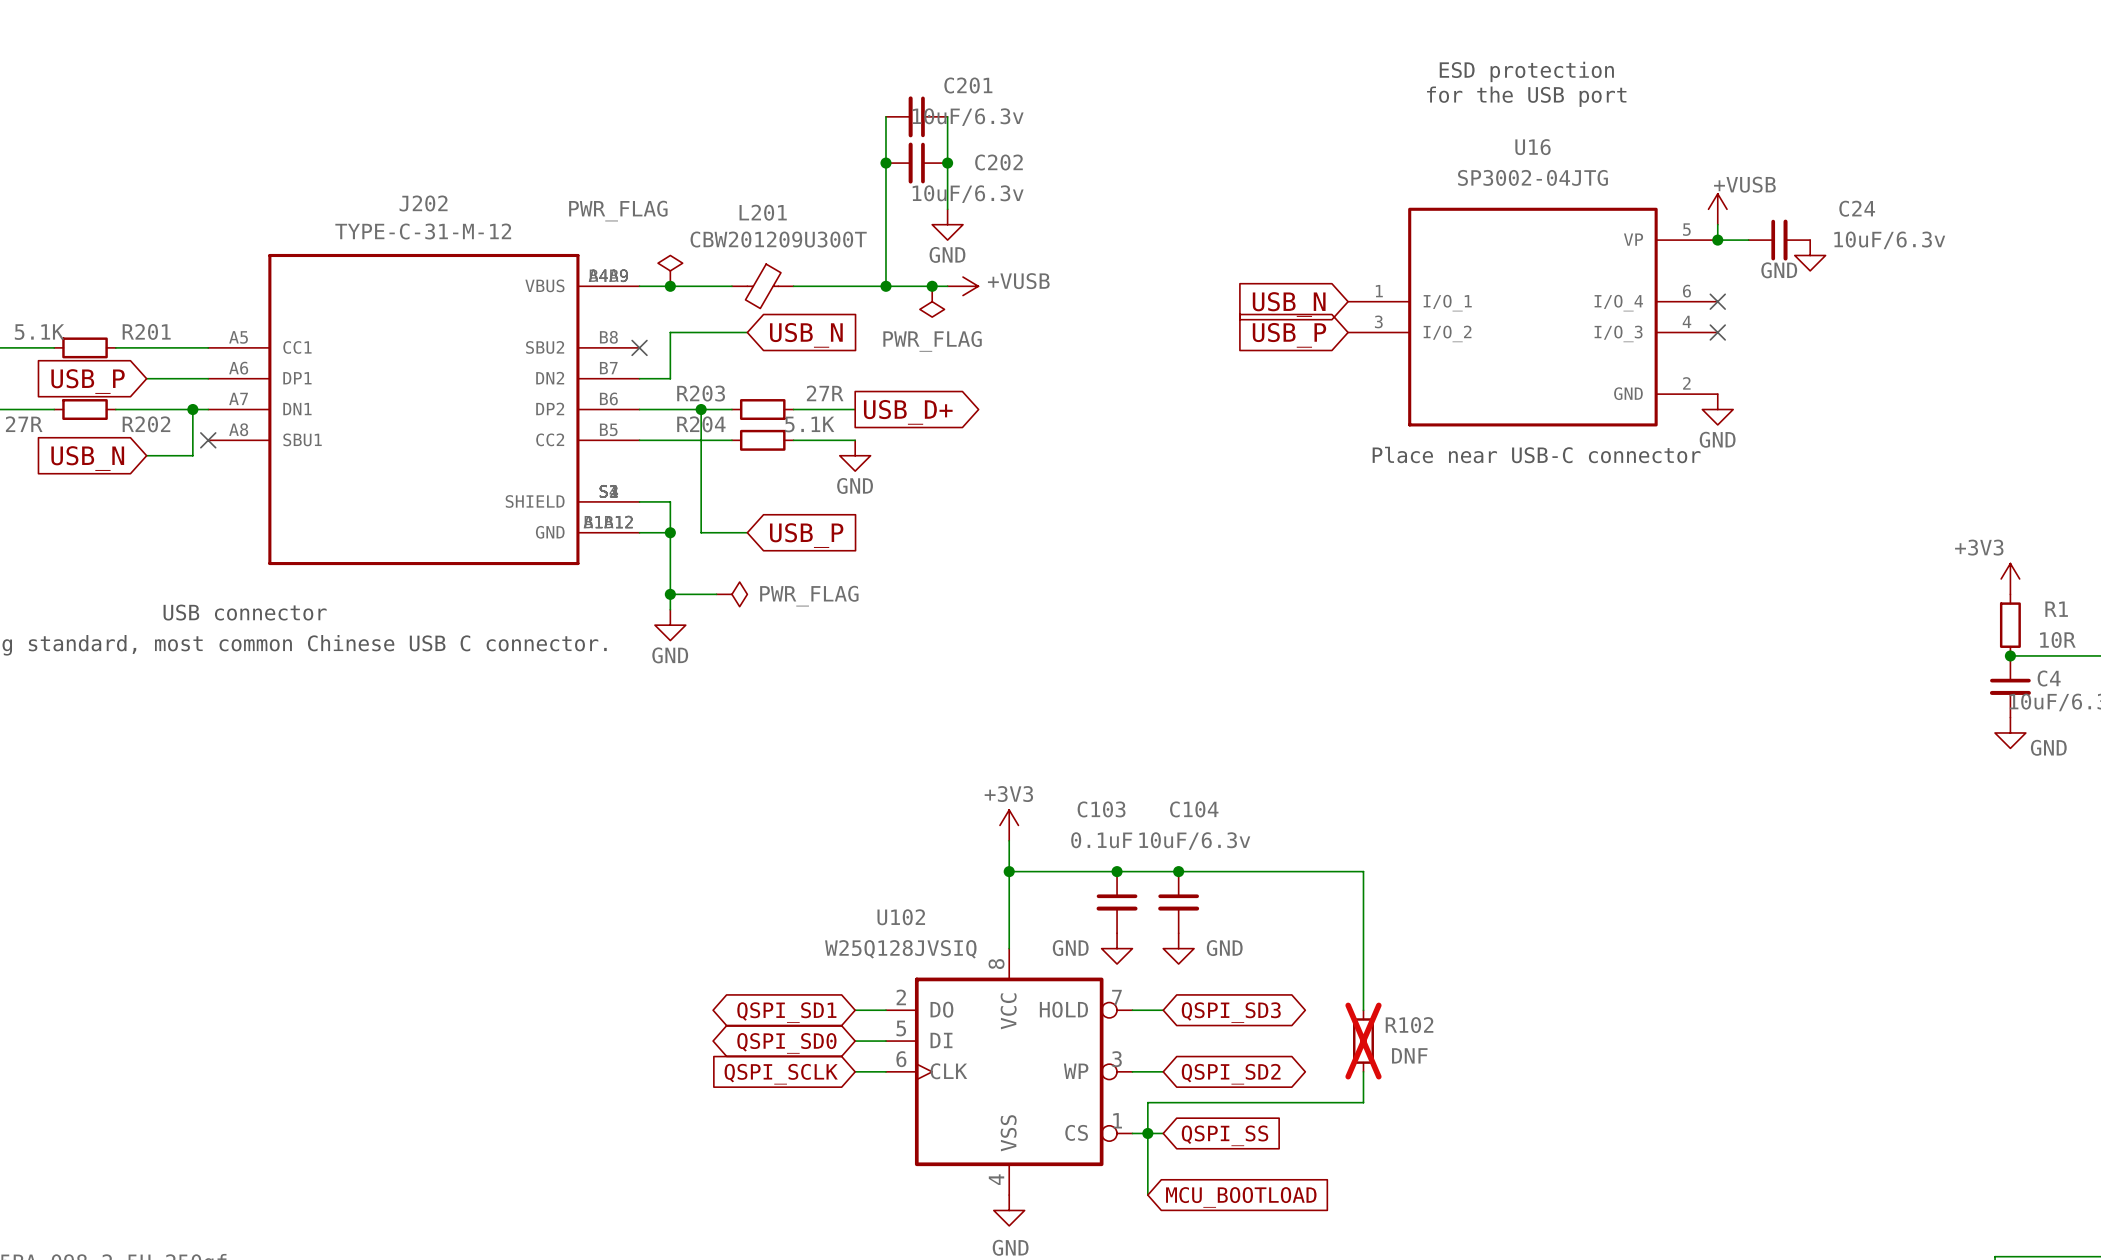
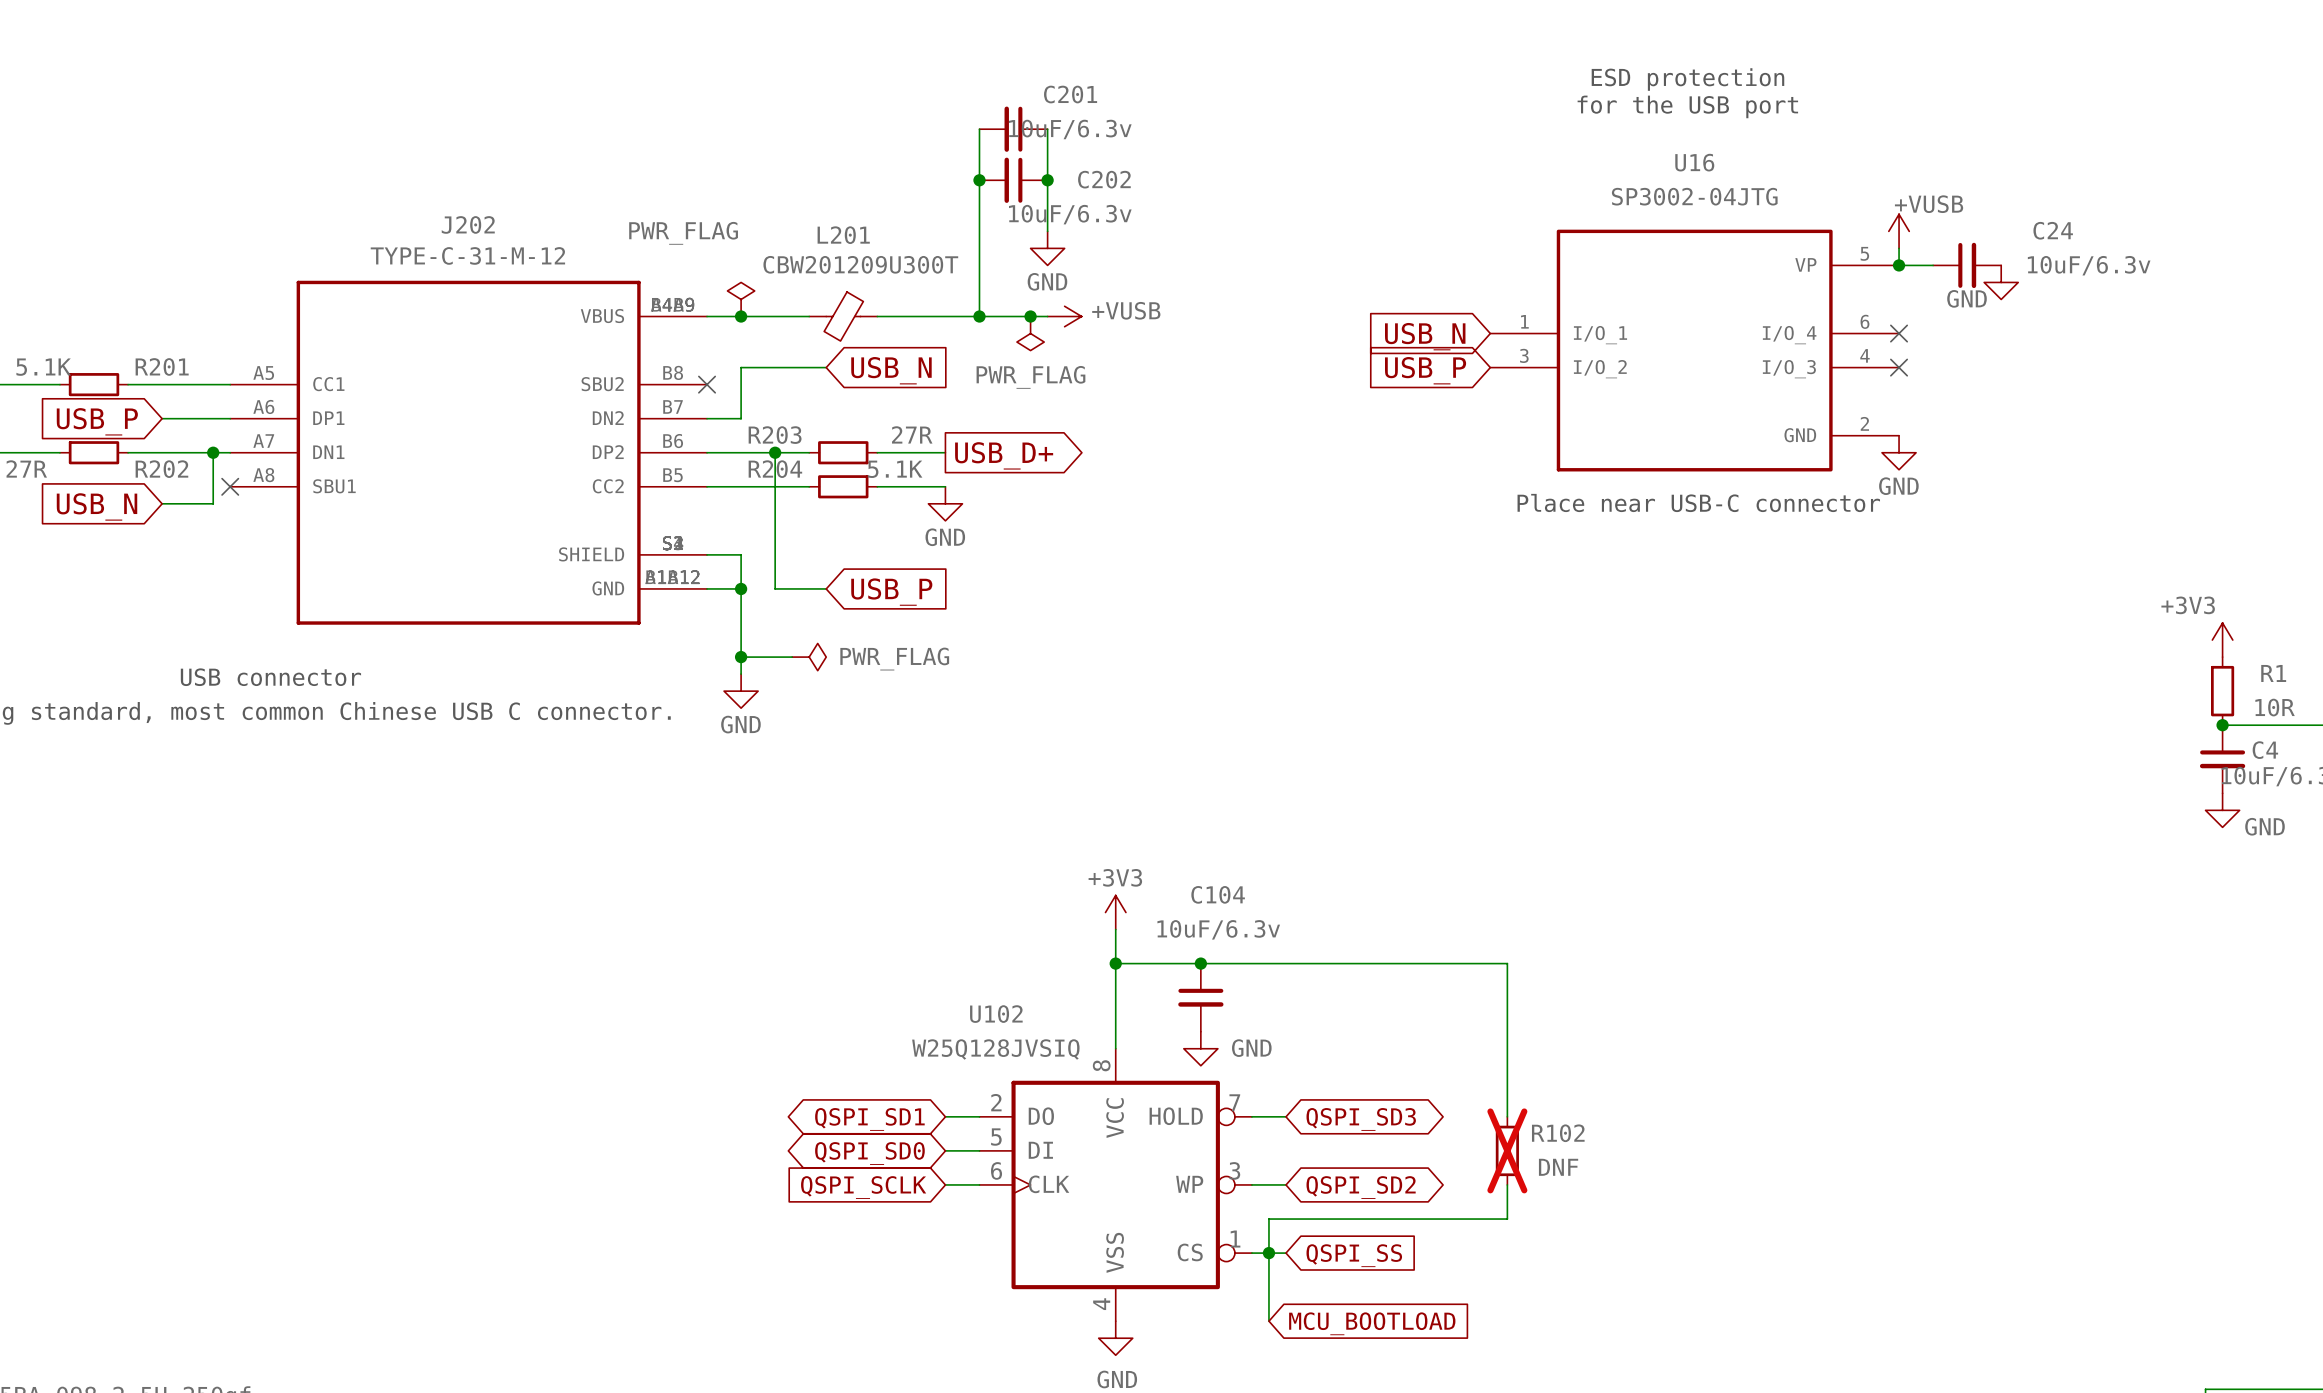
junction position: (1117, 871) -> (1200, 963)
junction: (1178, 871) -> none
C103: 0.1uF (1117, 902) -> none
C104 position: (1178, 902) -> (1200, 997)
power symbol text position: GND (1070, 948) -> GND (1251, 1048)
power symbol position: GND (1117, 948) -> GND (1200, 1048)
power symbol: GND (1178, 948) -> none

